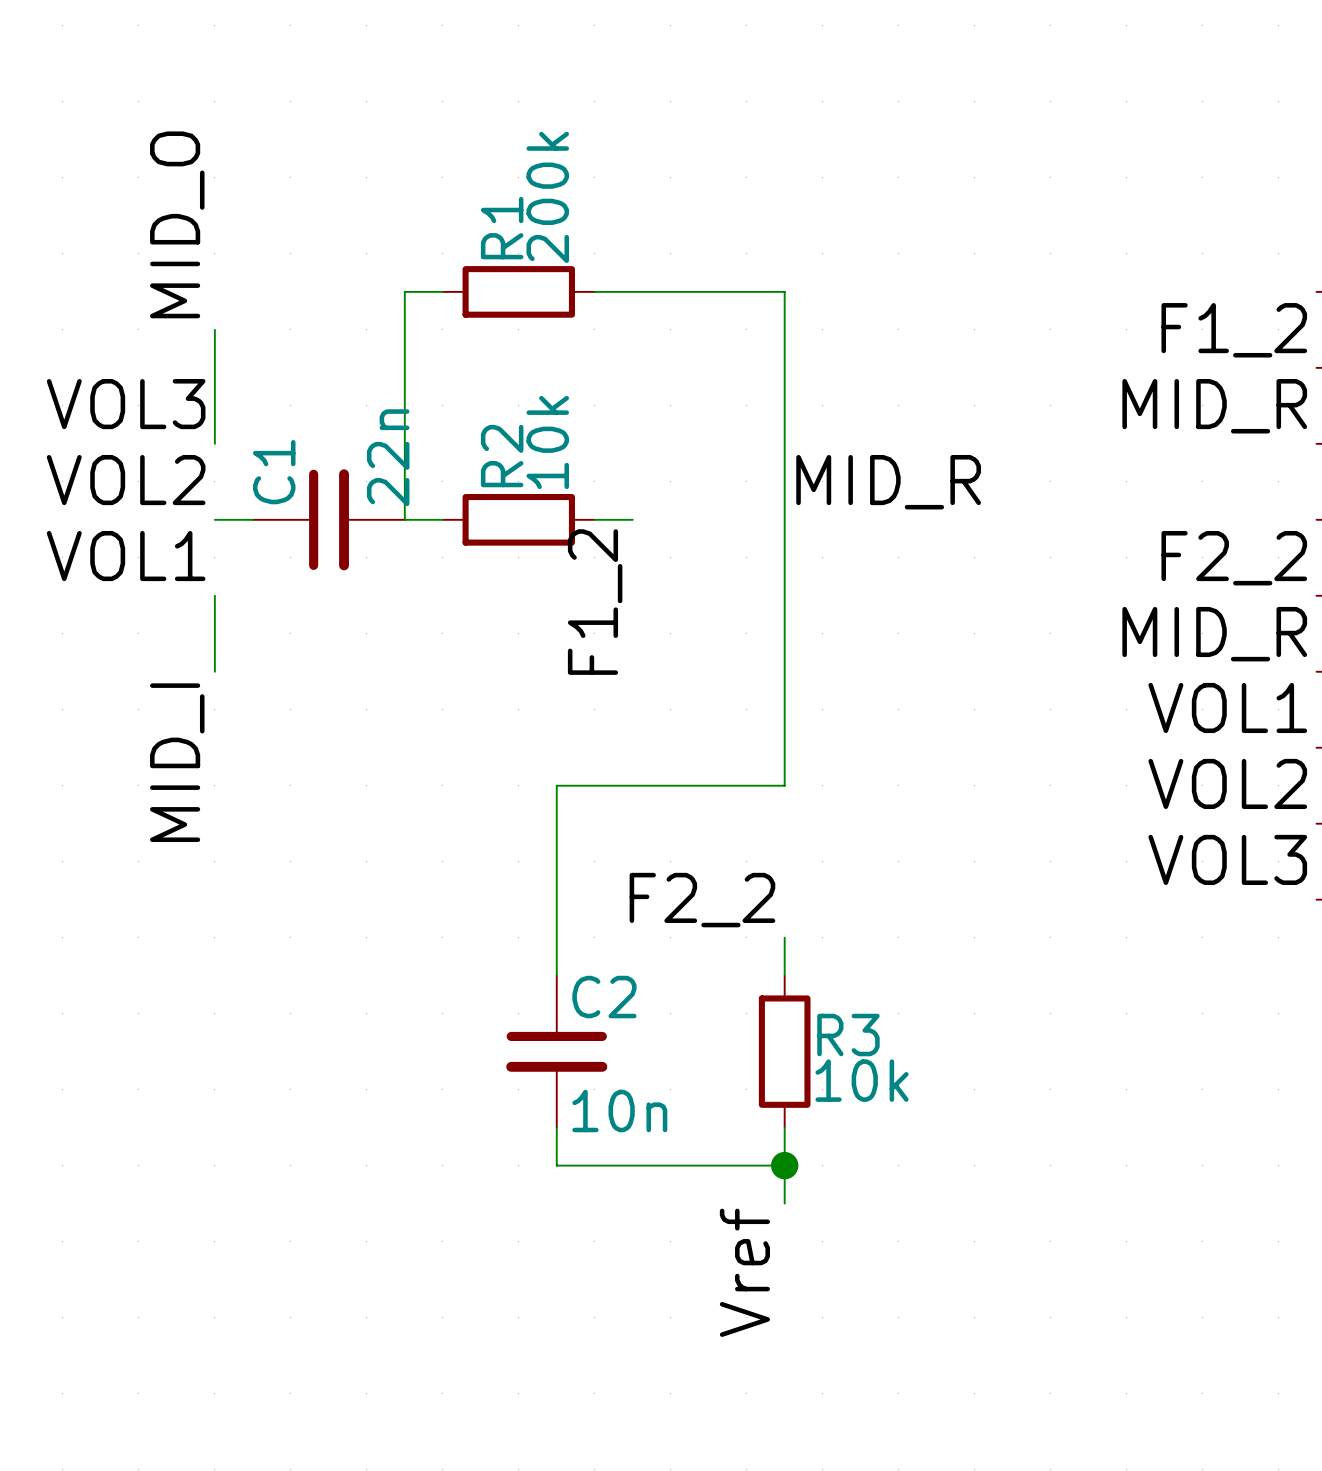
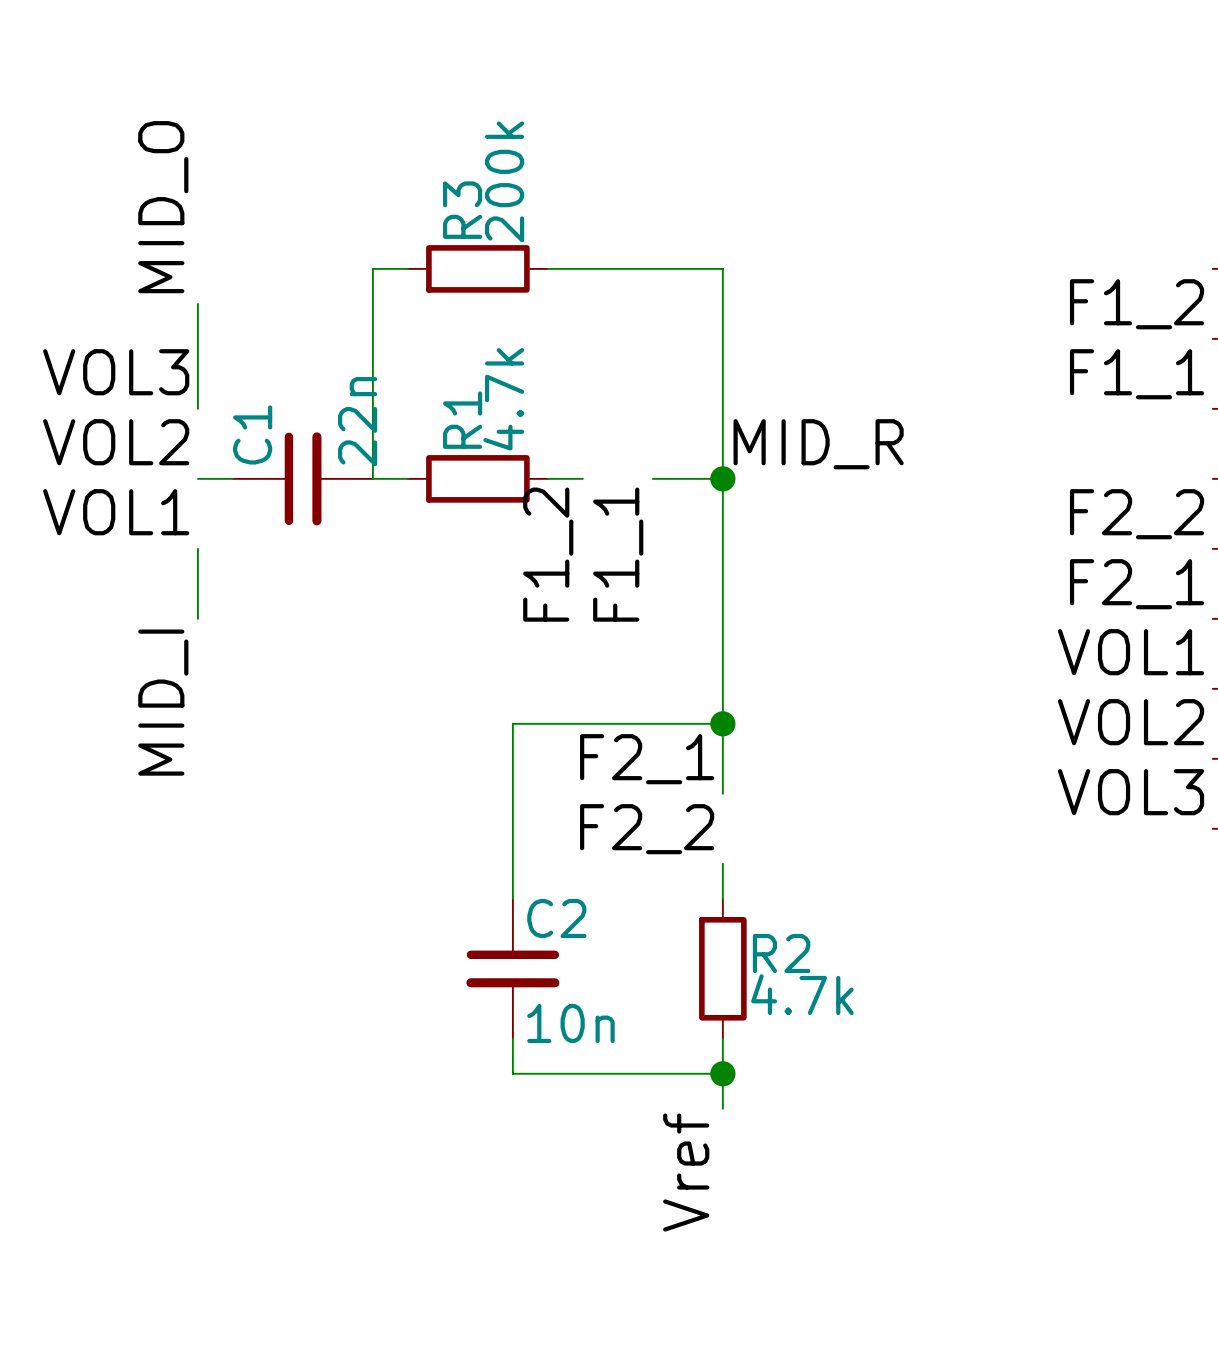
R1 name: R1 (502, 228) -> R3 (462, 210)
label: MID_R (1214, 406) -> F1_1 (1137, 374)
R2 value: 10k (547, 442) -> 4.7k (503, 399)
R2 name: R2 (502, 456) -> R1 (462, 420)
wire: none -> (652, 478) (722, 478)
junction: none -> (722, 478)
label: none -> F1_1 (618, 554)
label: MID_R (1214, 634) -> F2_1 (1137, 584)
wire: none -> (722, 723) (722, 793)
junction: none -> (722, 723)
label: none -> F2_1 (647, 759)
R3 name: R3 (848, 1035) -> R2 (781, 953)
R3 value: 10k (862, 1080) -> 4.7k (802, 994)

